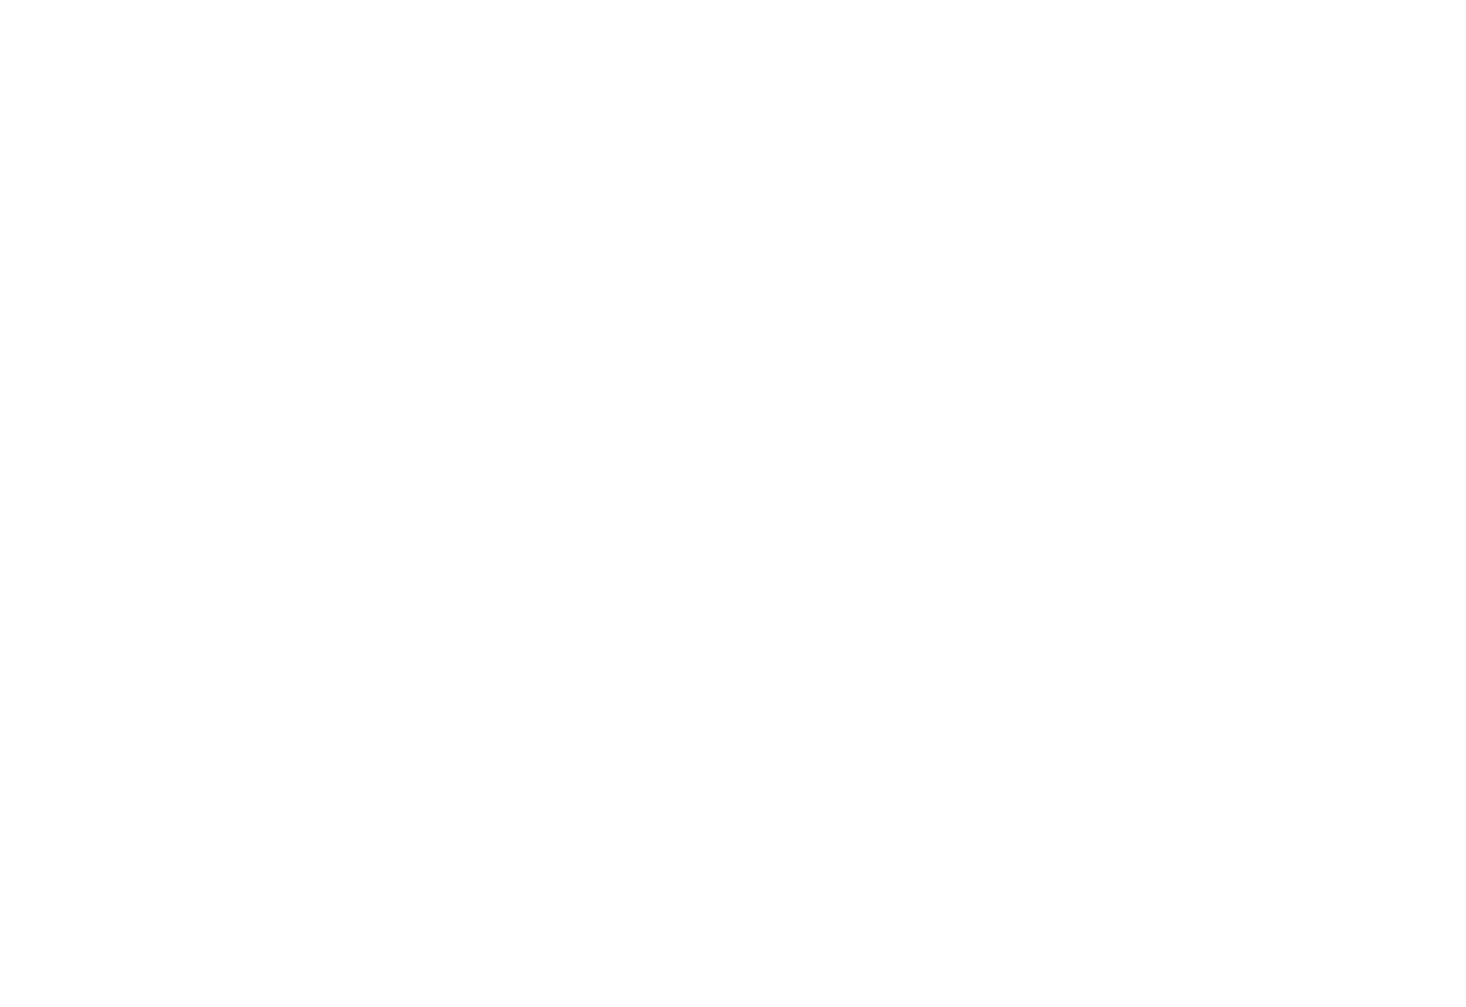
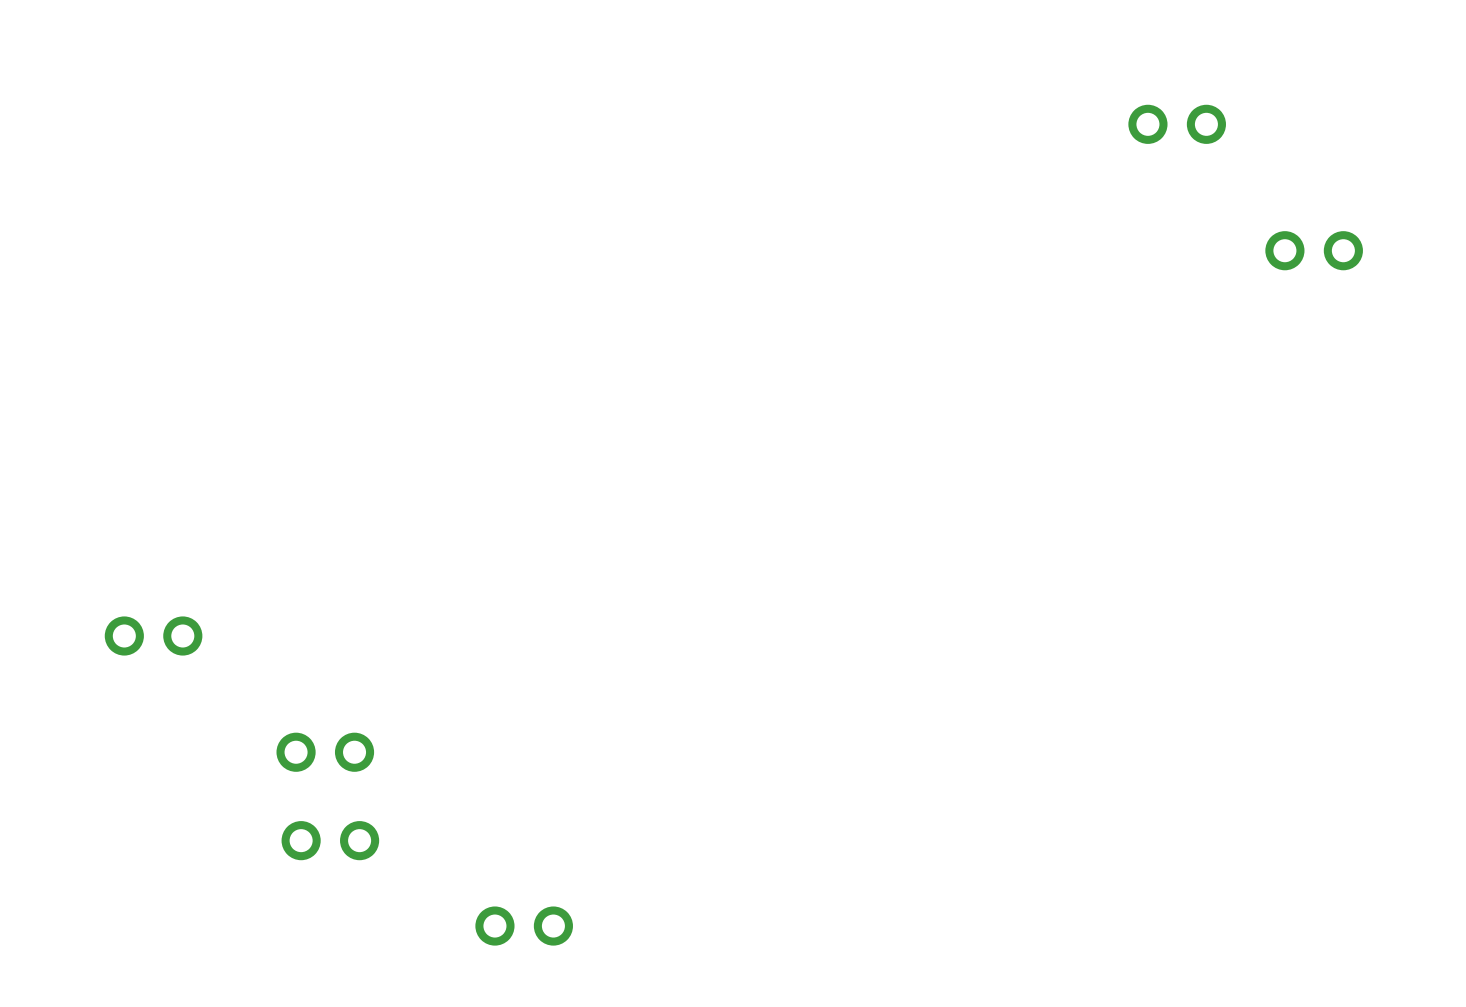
part: none -> (1177, 124)
part: none -> (1314, 250)
part: none -> (153, 636)
part: none -> (325, 752)
part: none -> (330, 840)
part: none -> (524, 926)

